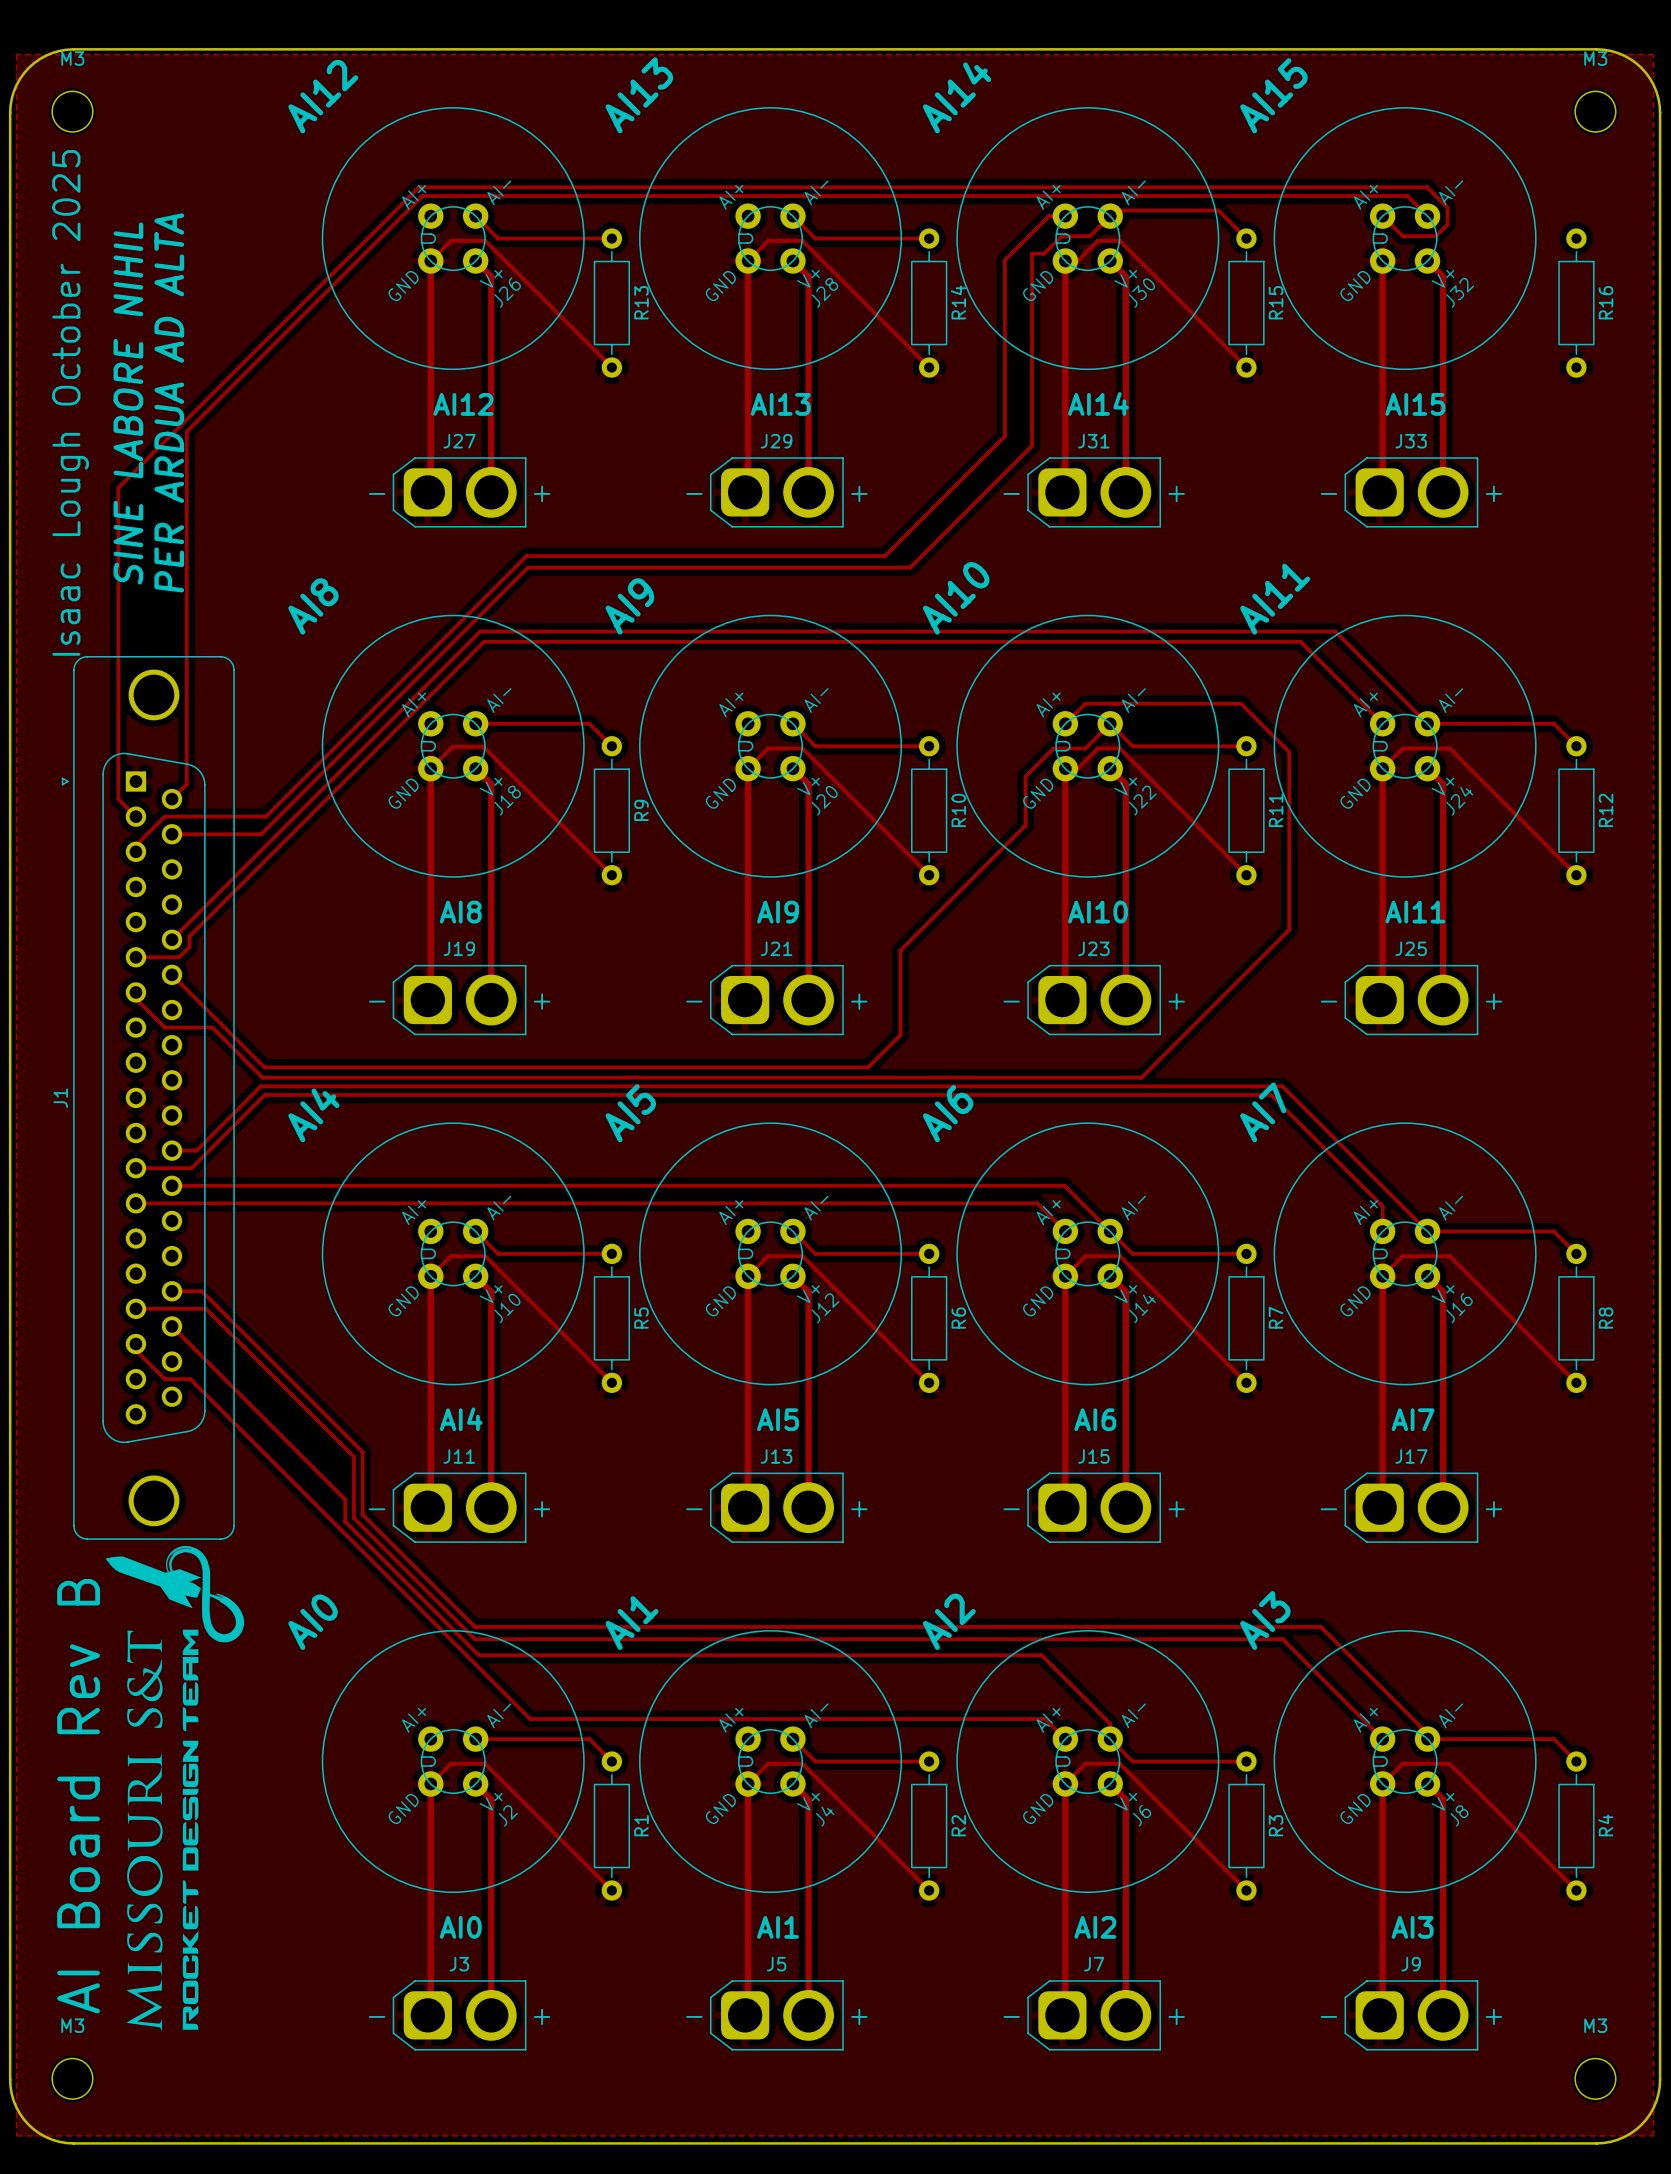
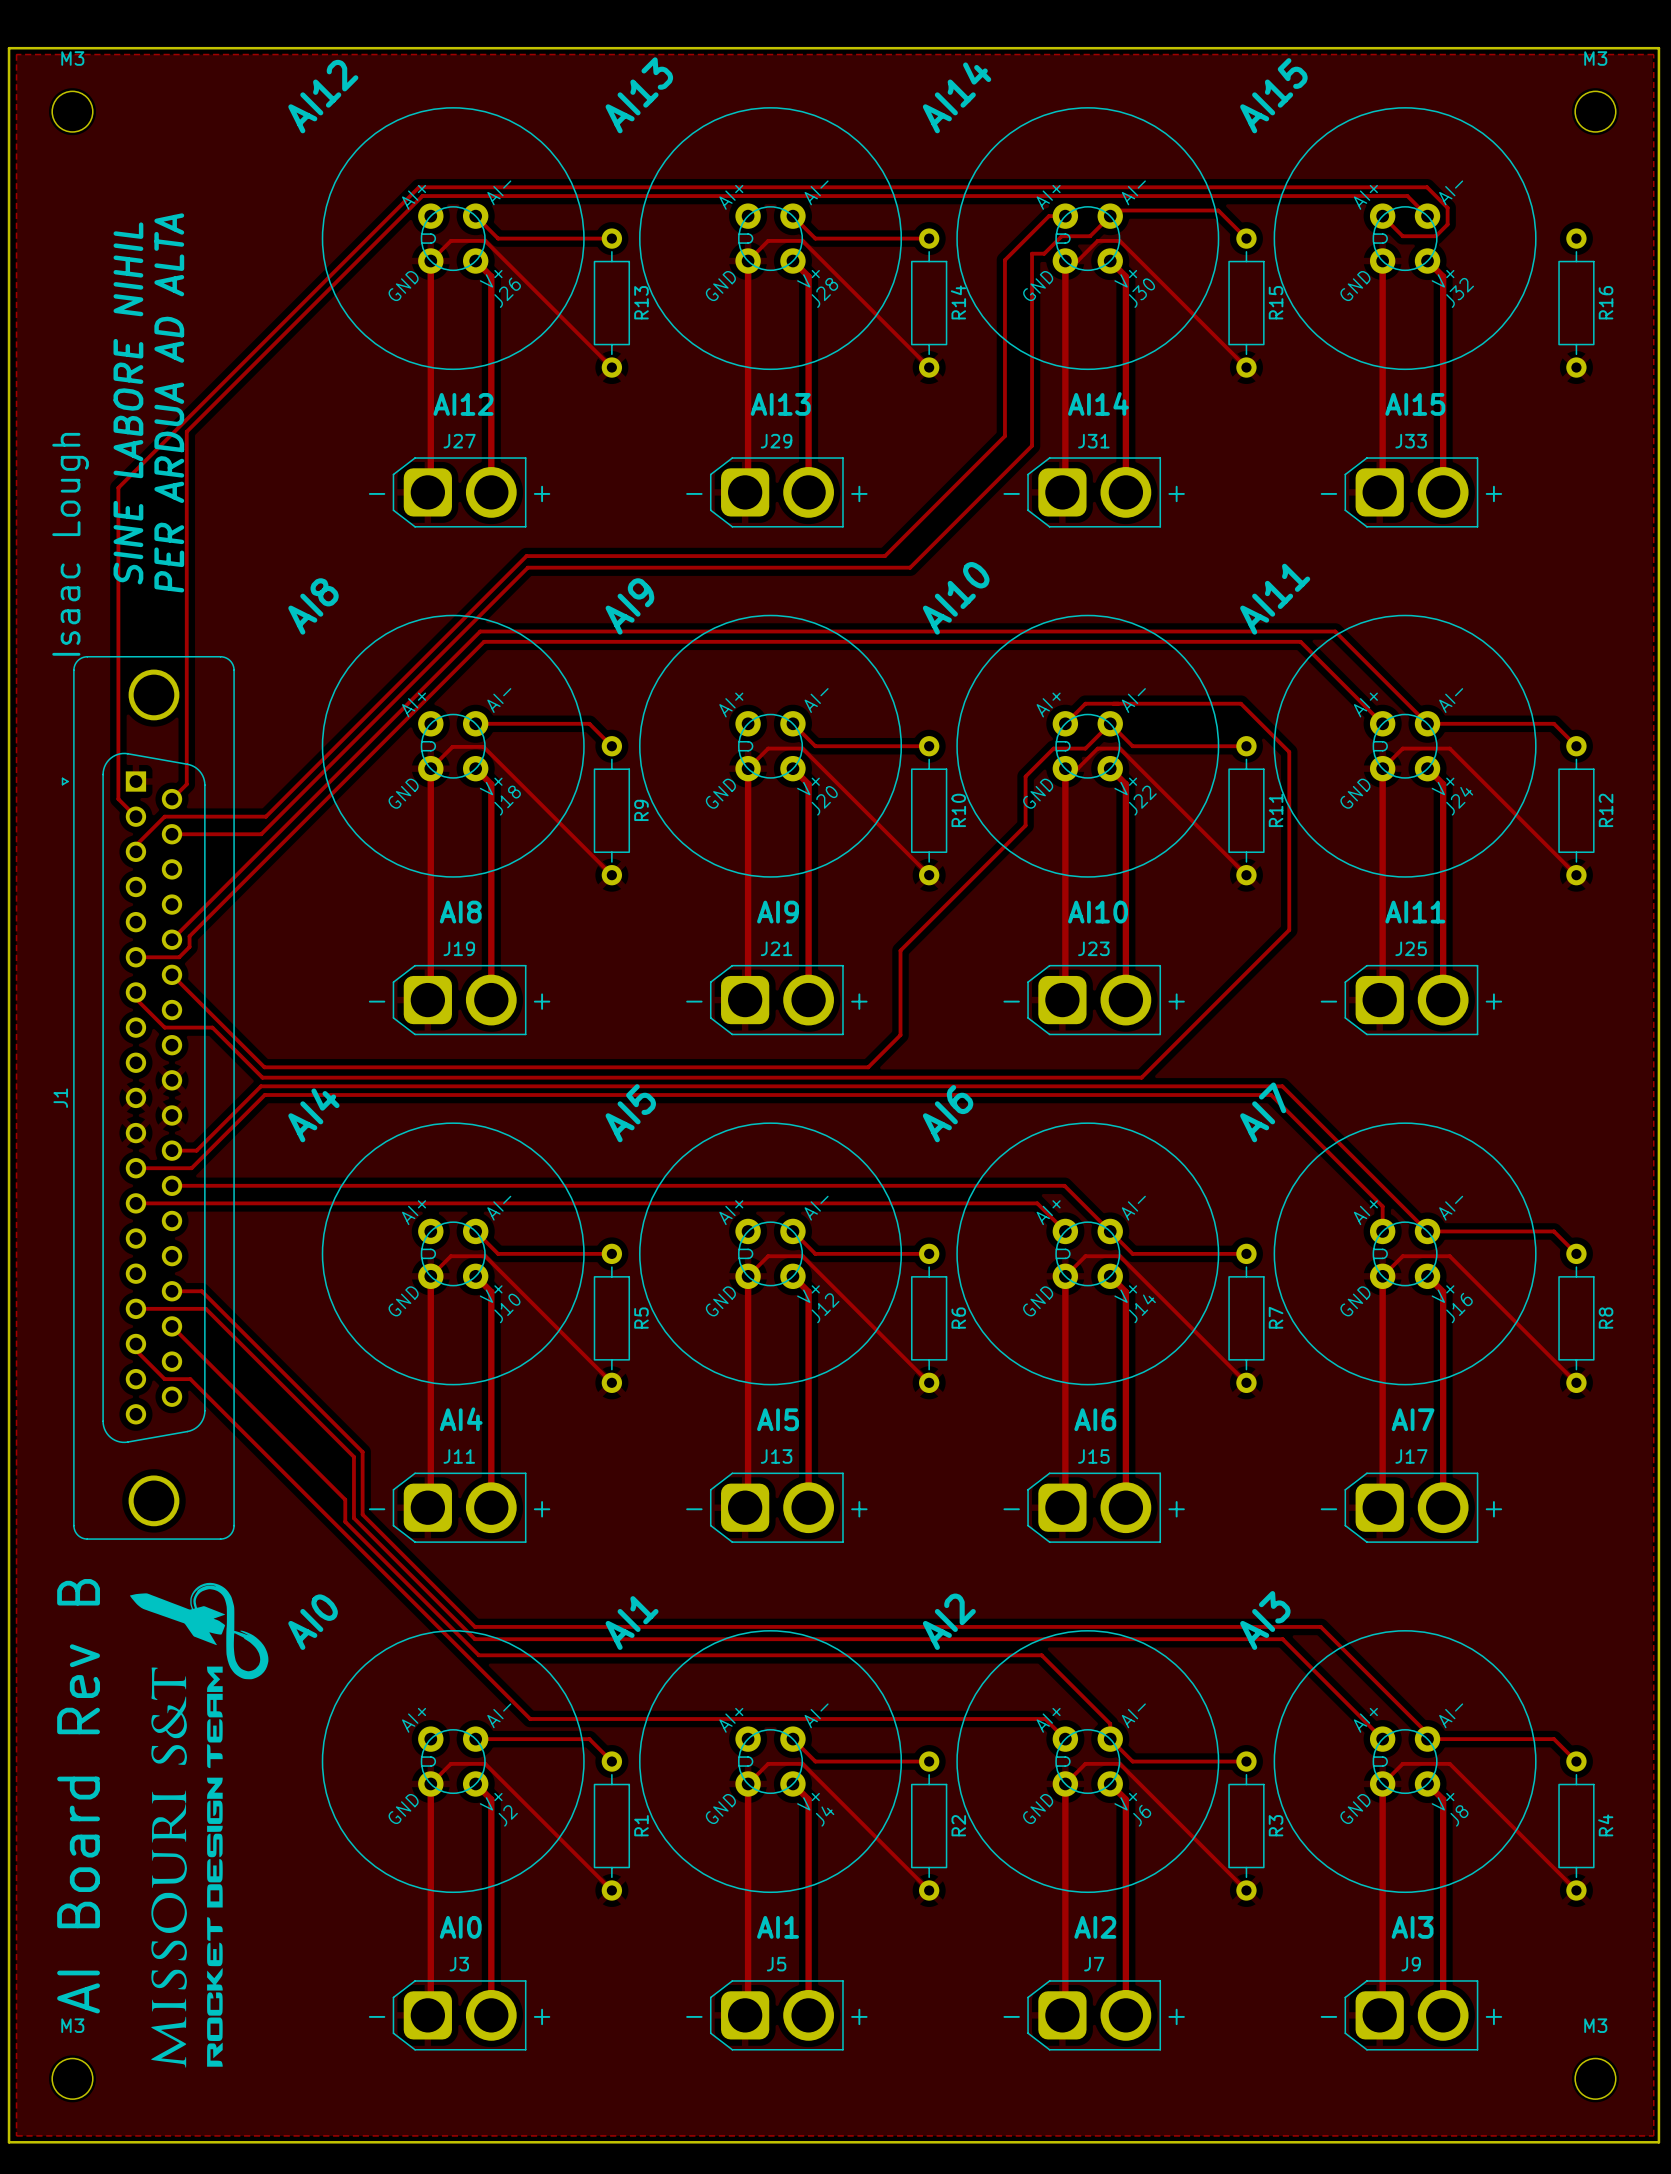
board edge: (73, 49) (1596, 49) (1610, 50) (1624, 55) (1636, 63) (1646, 73) (1656, 91) (1660, 112) (1660, 2079) (1658, 2094) (1653, 2107) (1646, 2119) (1636, 2129) (1617, 2139) (1596, 2143) (73, 2143) (59, 2141) (46, 2137) (34, 2129) (24, 2119) (13, 2100) (10, 2079) (10, 112) (13, 91) (19, 79) (28, 67) (46, 55) (59, 50) (73, 49) -> (9, 48) (9, 2142) (1658, 2142) (1658, 48) (9, 48)
text: October 2025 (66, 277) -> none
drawing position: (174, 1788) -> (199, 1825)

